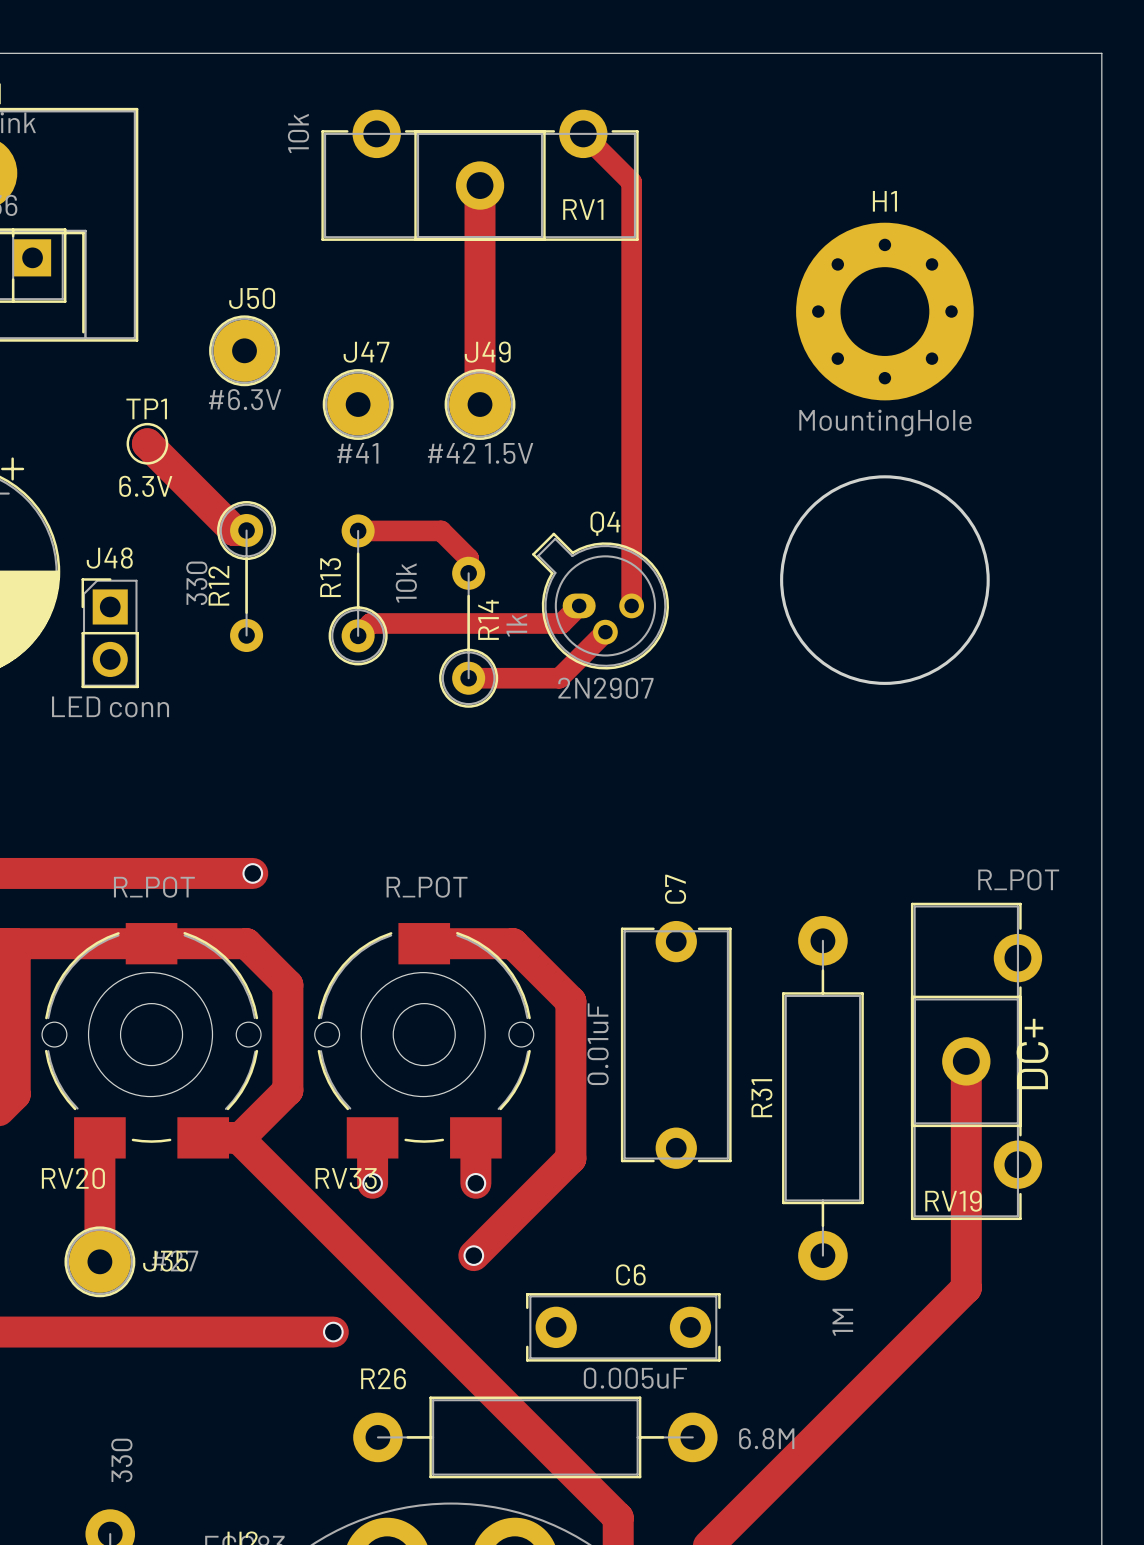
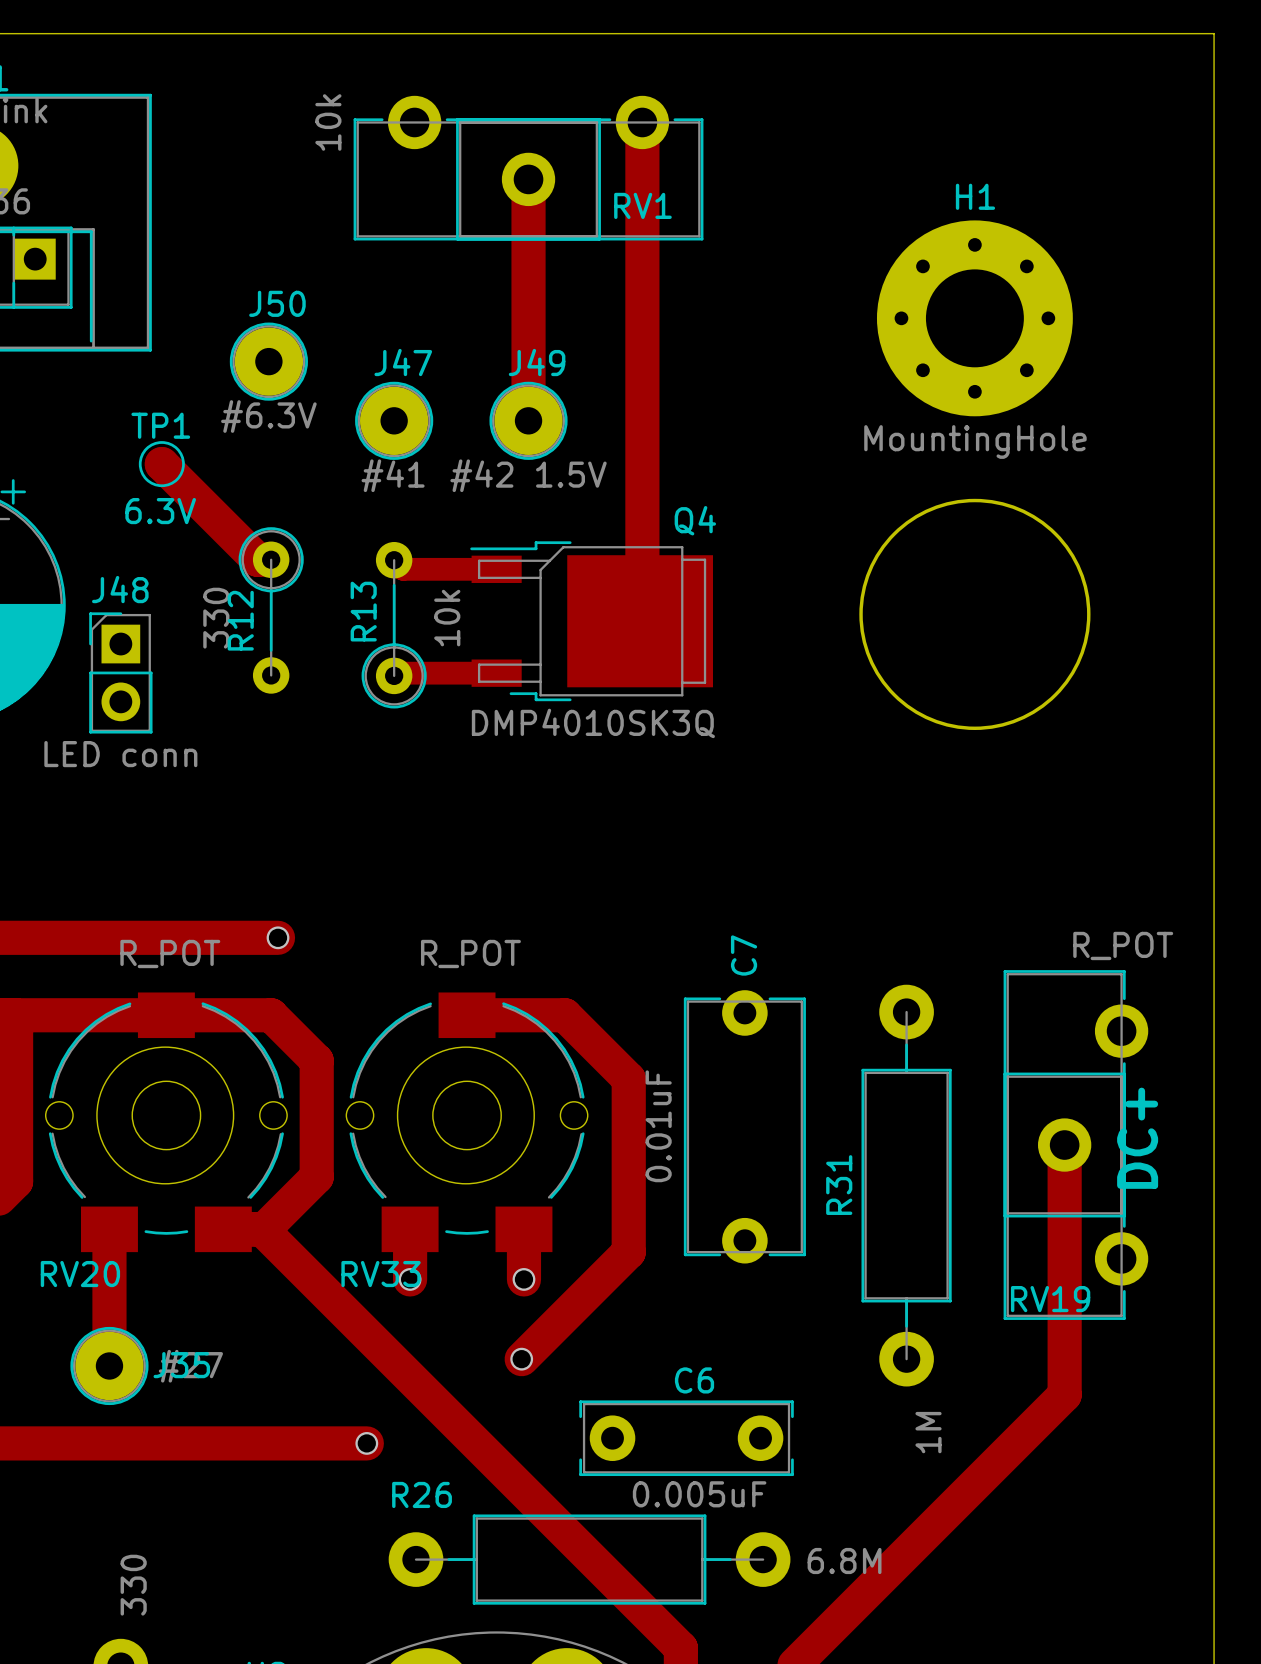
track: (583, 133) (631, 182) (631, 605) -> (642, 122) (642, 618) (640, 621)
Q4 name position: Q4 (605, 523) -> Q4 (695, 520)
track: (358, 530) (441, 530) (468, 558) (468, 573) -> (394, 560) (403, 569) (496, 569)
Q4 footprint: [532, 532, 670, 670] -> [470, 541, 714, 702]
track: (579, 605) (561, 623) (370, 623) (360, 633) -> (496, 673) (396, 673)
R14: 1k (468, 632) -> none
track: (605, 632) (559, 678) (468, 678) -> none
Q4 value: 2N2907 (605, 688) -> DMP4010SK3Q (593, 723)

